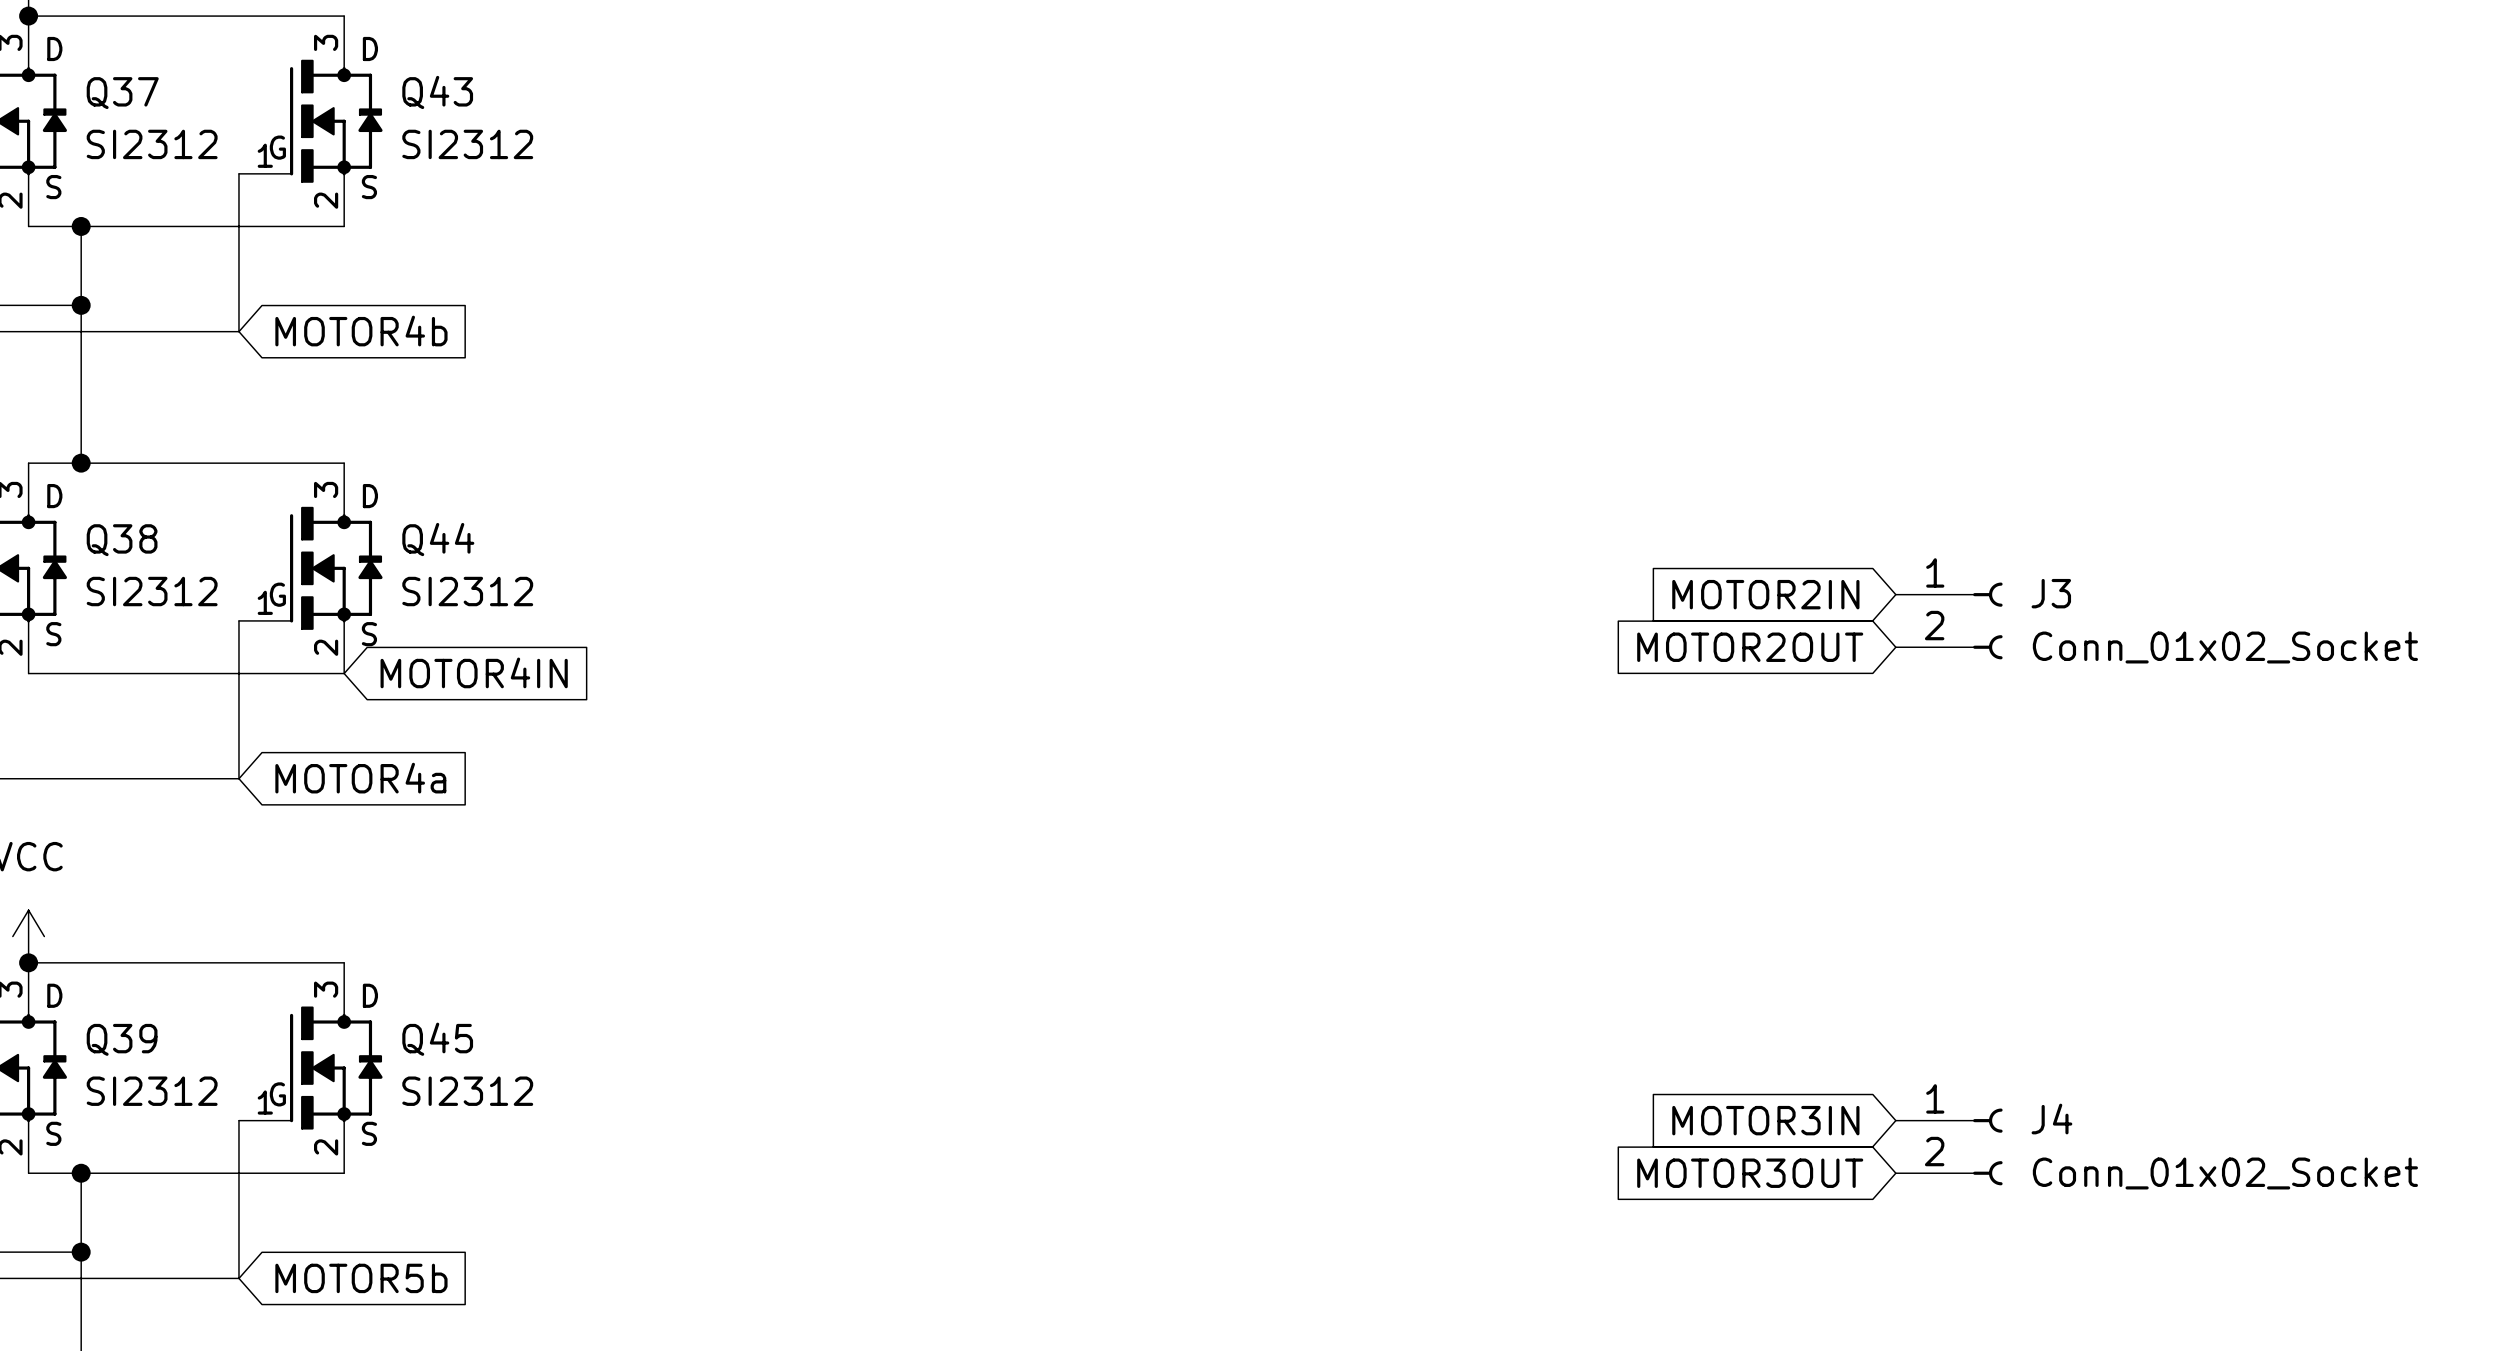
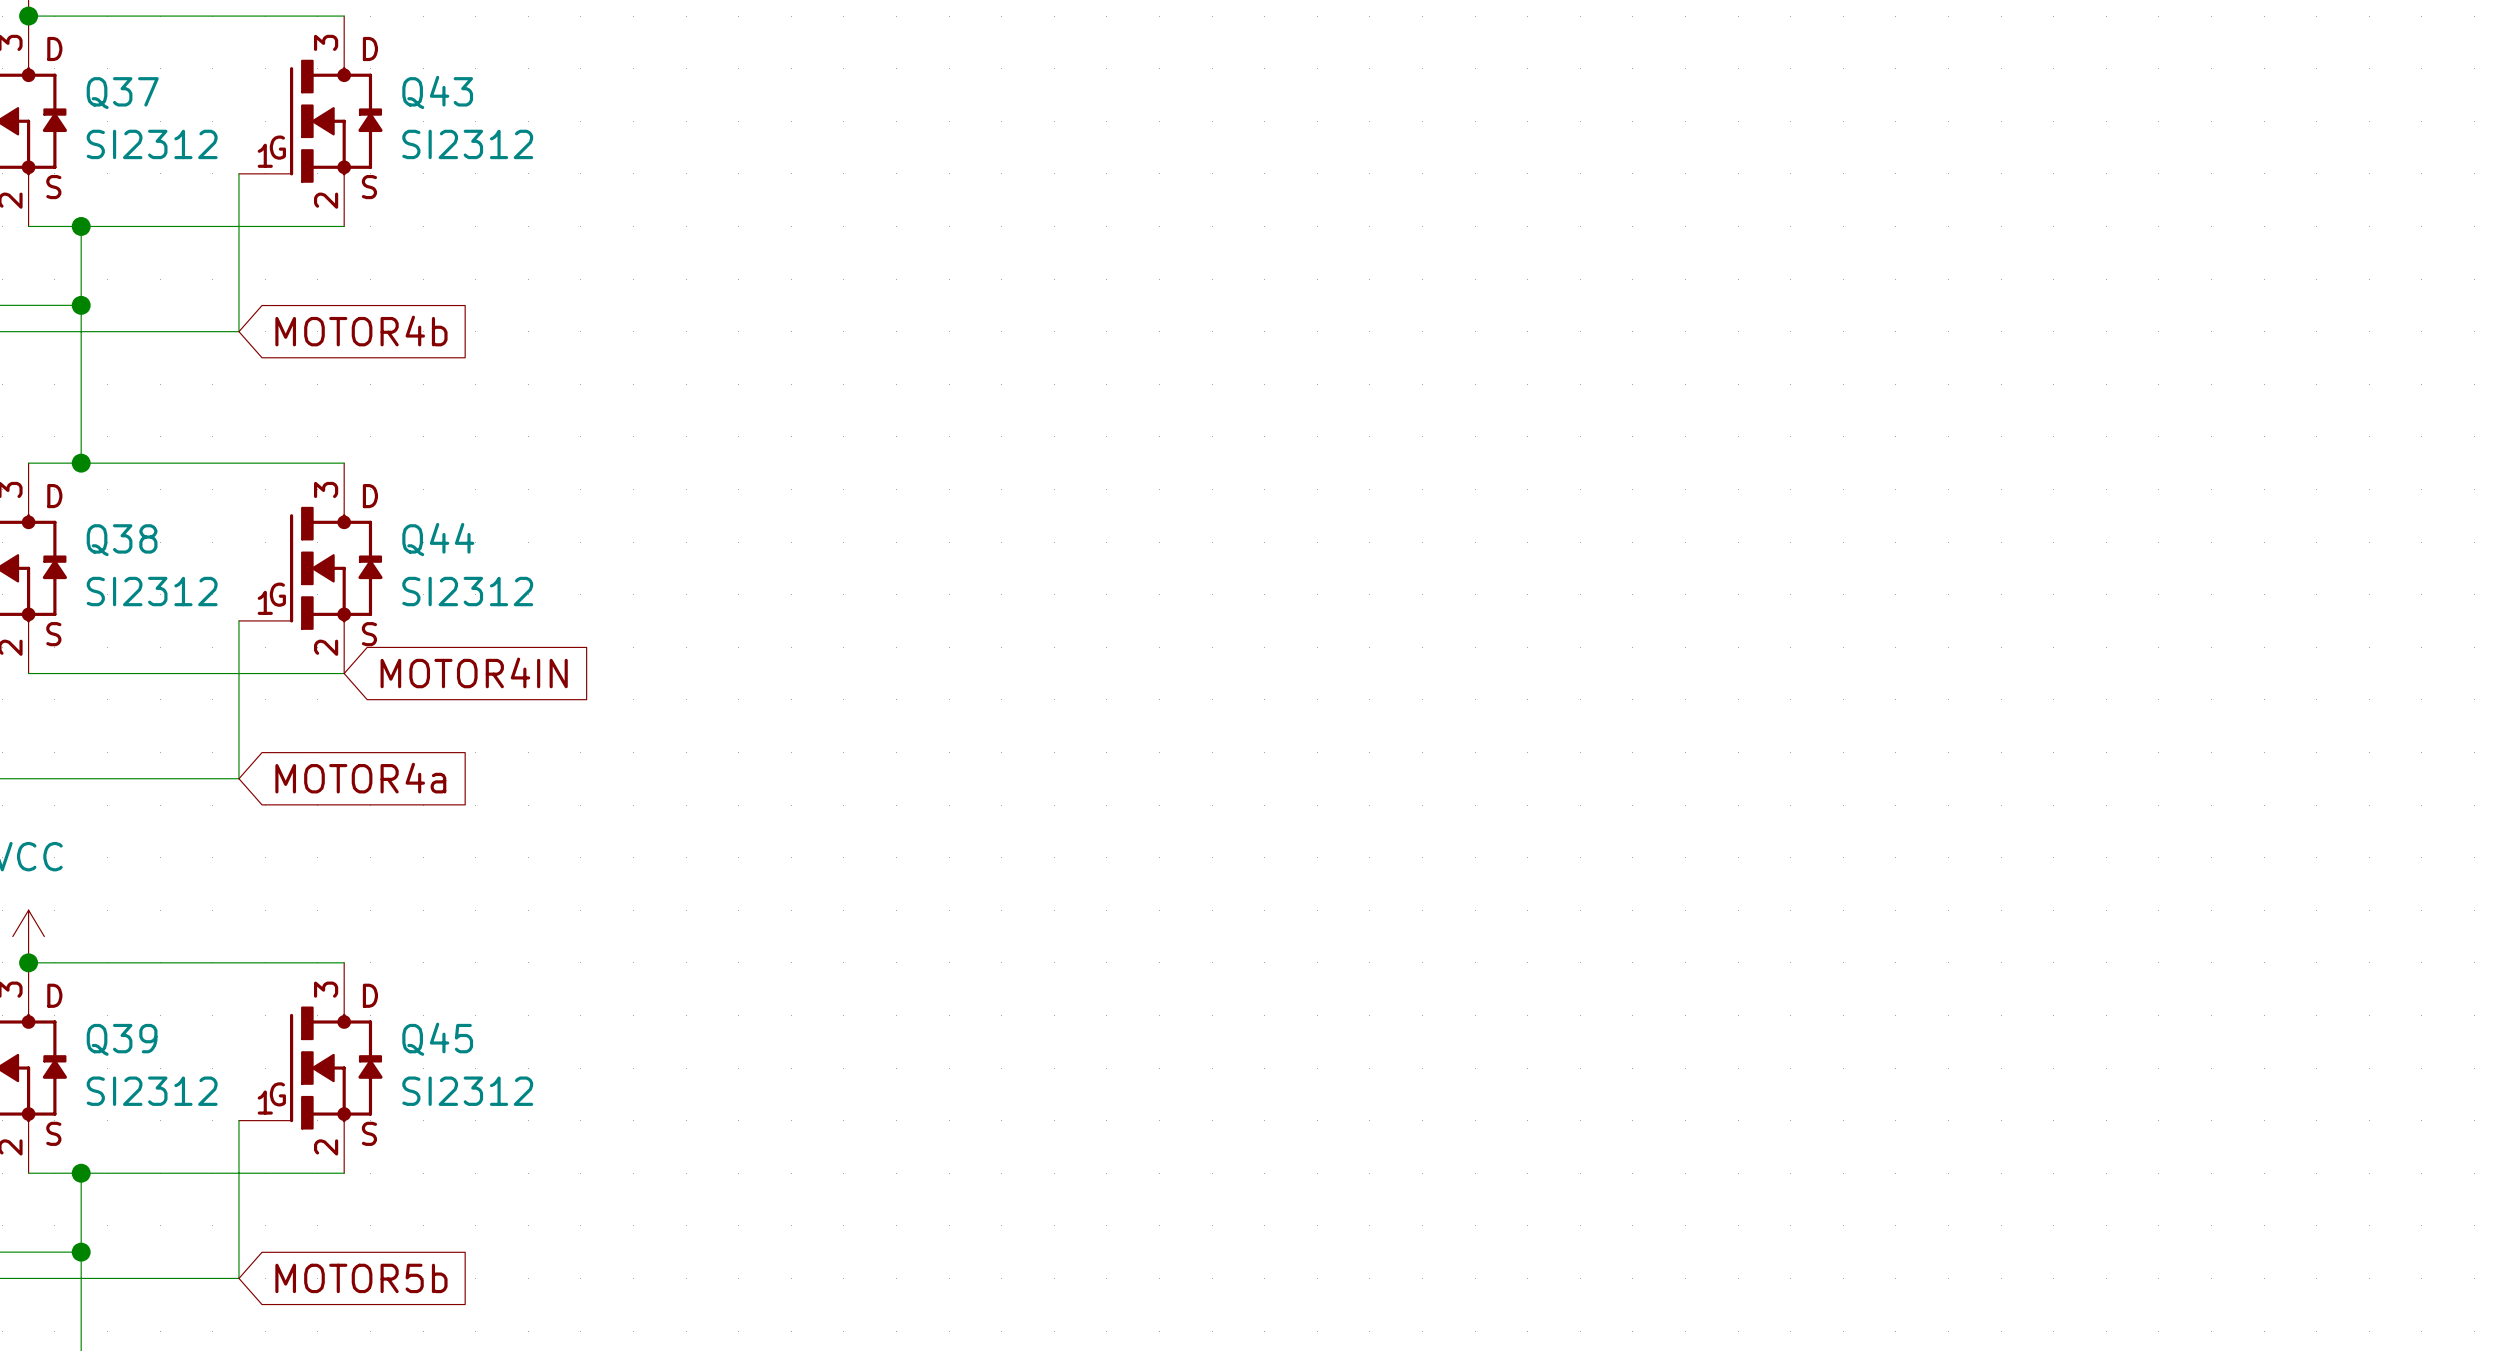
global label: MOTOR2IN (1765, 594) -> none
J3: Conn_01x02_Socket (1949, 620) -> none
global label: MOTOR2OUT (1750, 647) -> none
global label: MOTOR3IN (1765, 1120) -> none
J4: Conn_01x02_Socket (1949, 1146) -> none
global label: MOTOR3OUT (1750, 1173) -> none

